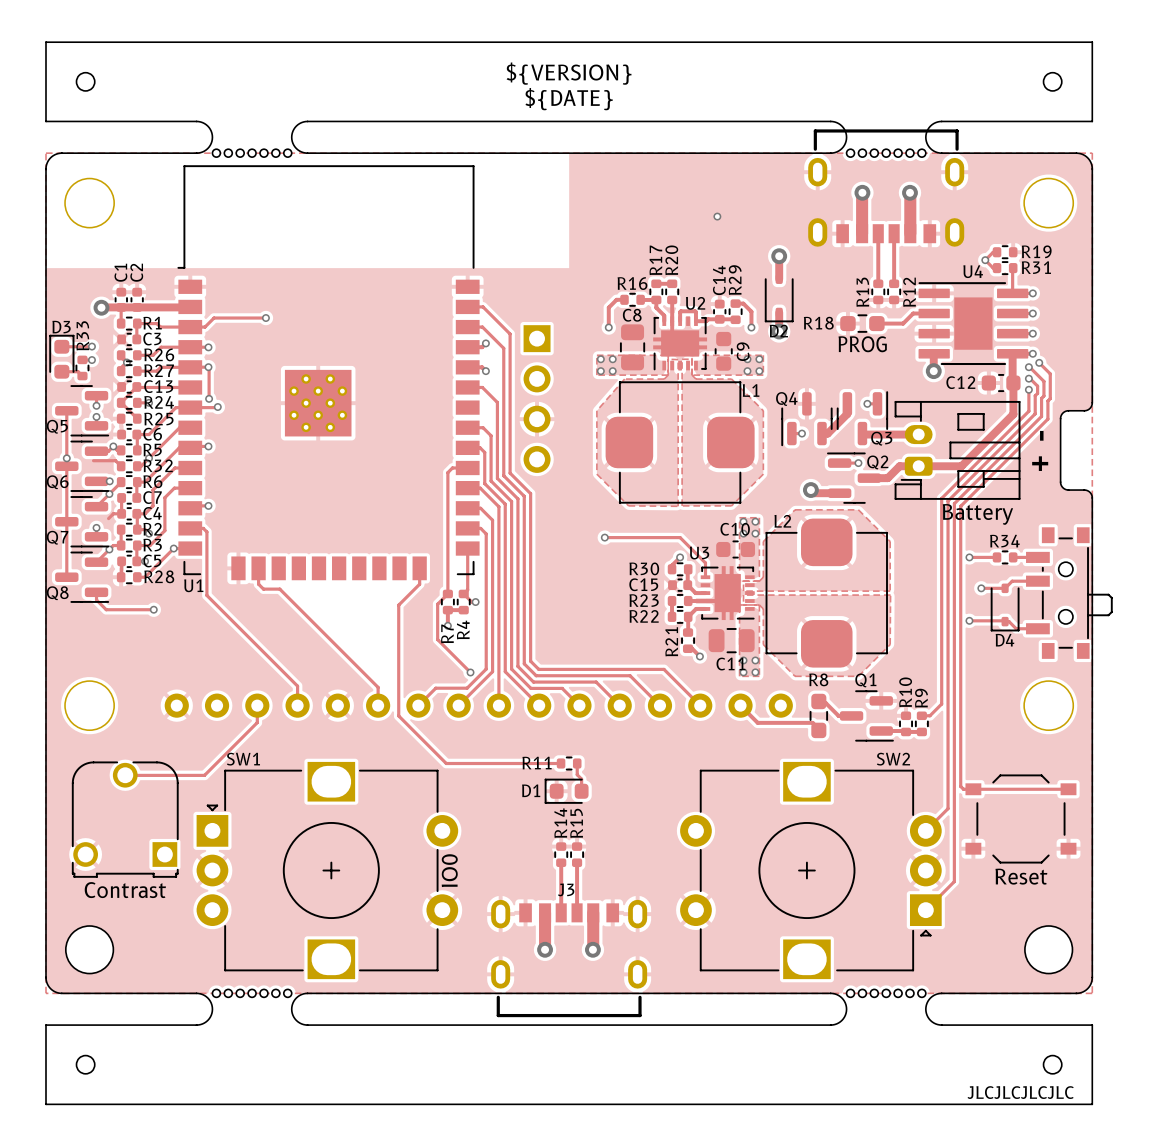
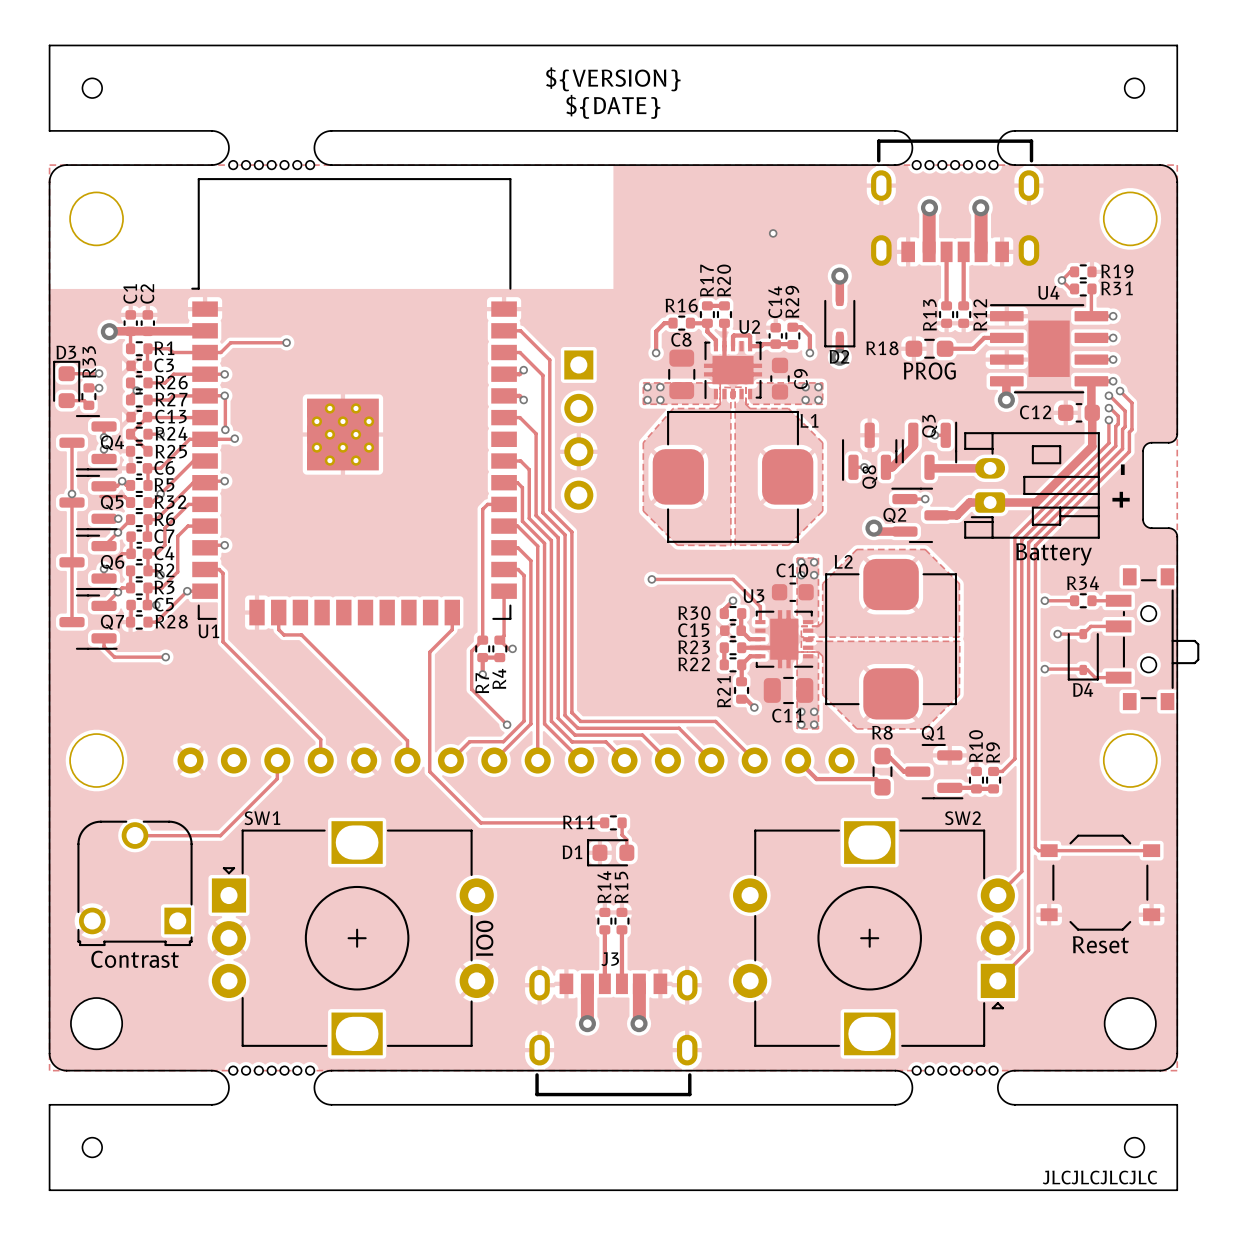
Q4 name: Q4 (786, 399) -> Q8 (869, 477)
Q5 name: Q5 (57, 426) -> Q4 (112, 442)
Q3 name rotation: 0° (881, 438) -> 90° counterclockwise (929, 426)
Q3 name position: Q3 (881, 438) -> Q3 (929, 426)
Q2 name position: Q2 (877, 462) -> Q2 (894, 515)
Q6 name: Q6 (57, 482) -> Q5 (112, 502)
Q7 name: Q7 (57, 537) -> Q6 (112, 562)
Q8 name: Q8 (57, 593) -> Q7 (112, 622)

